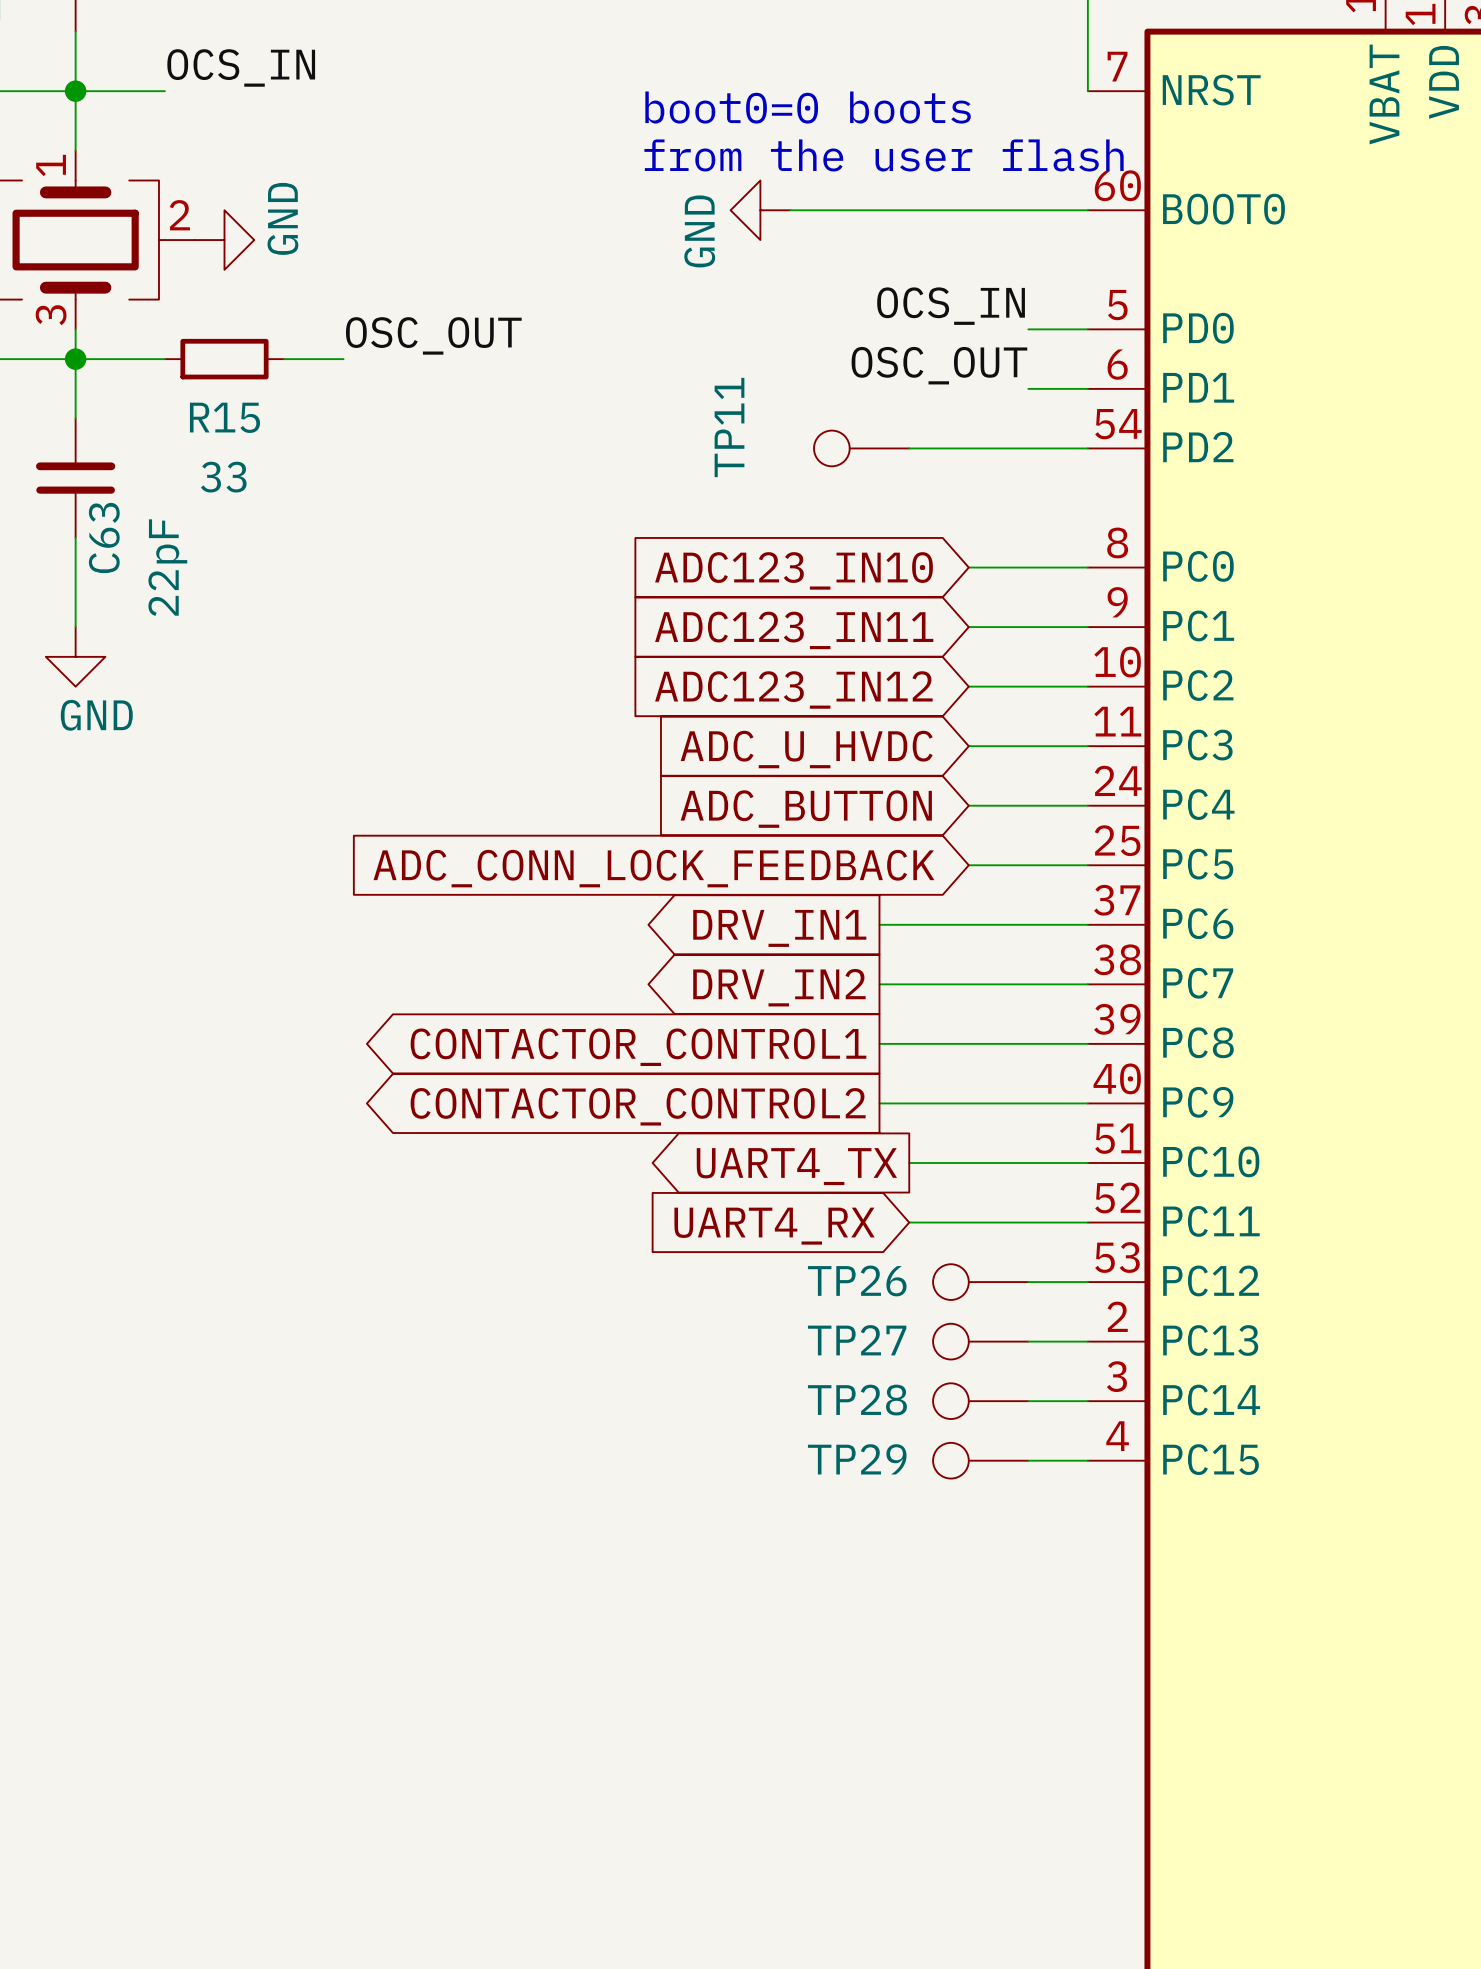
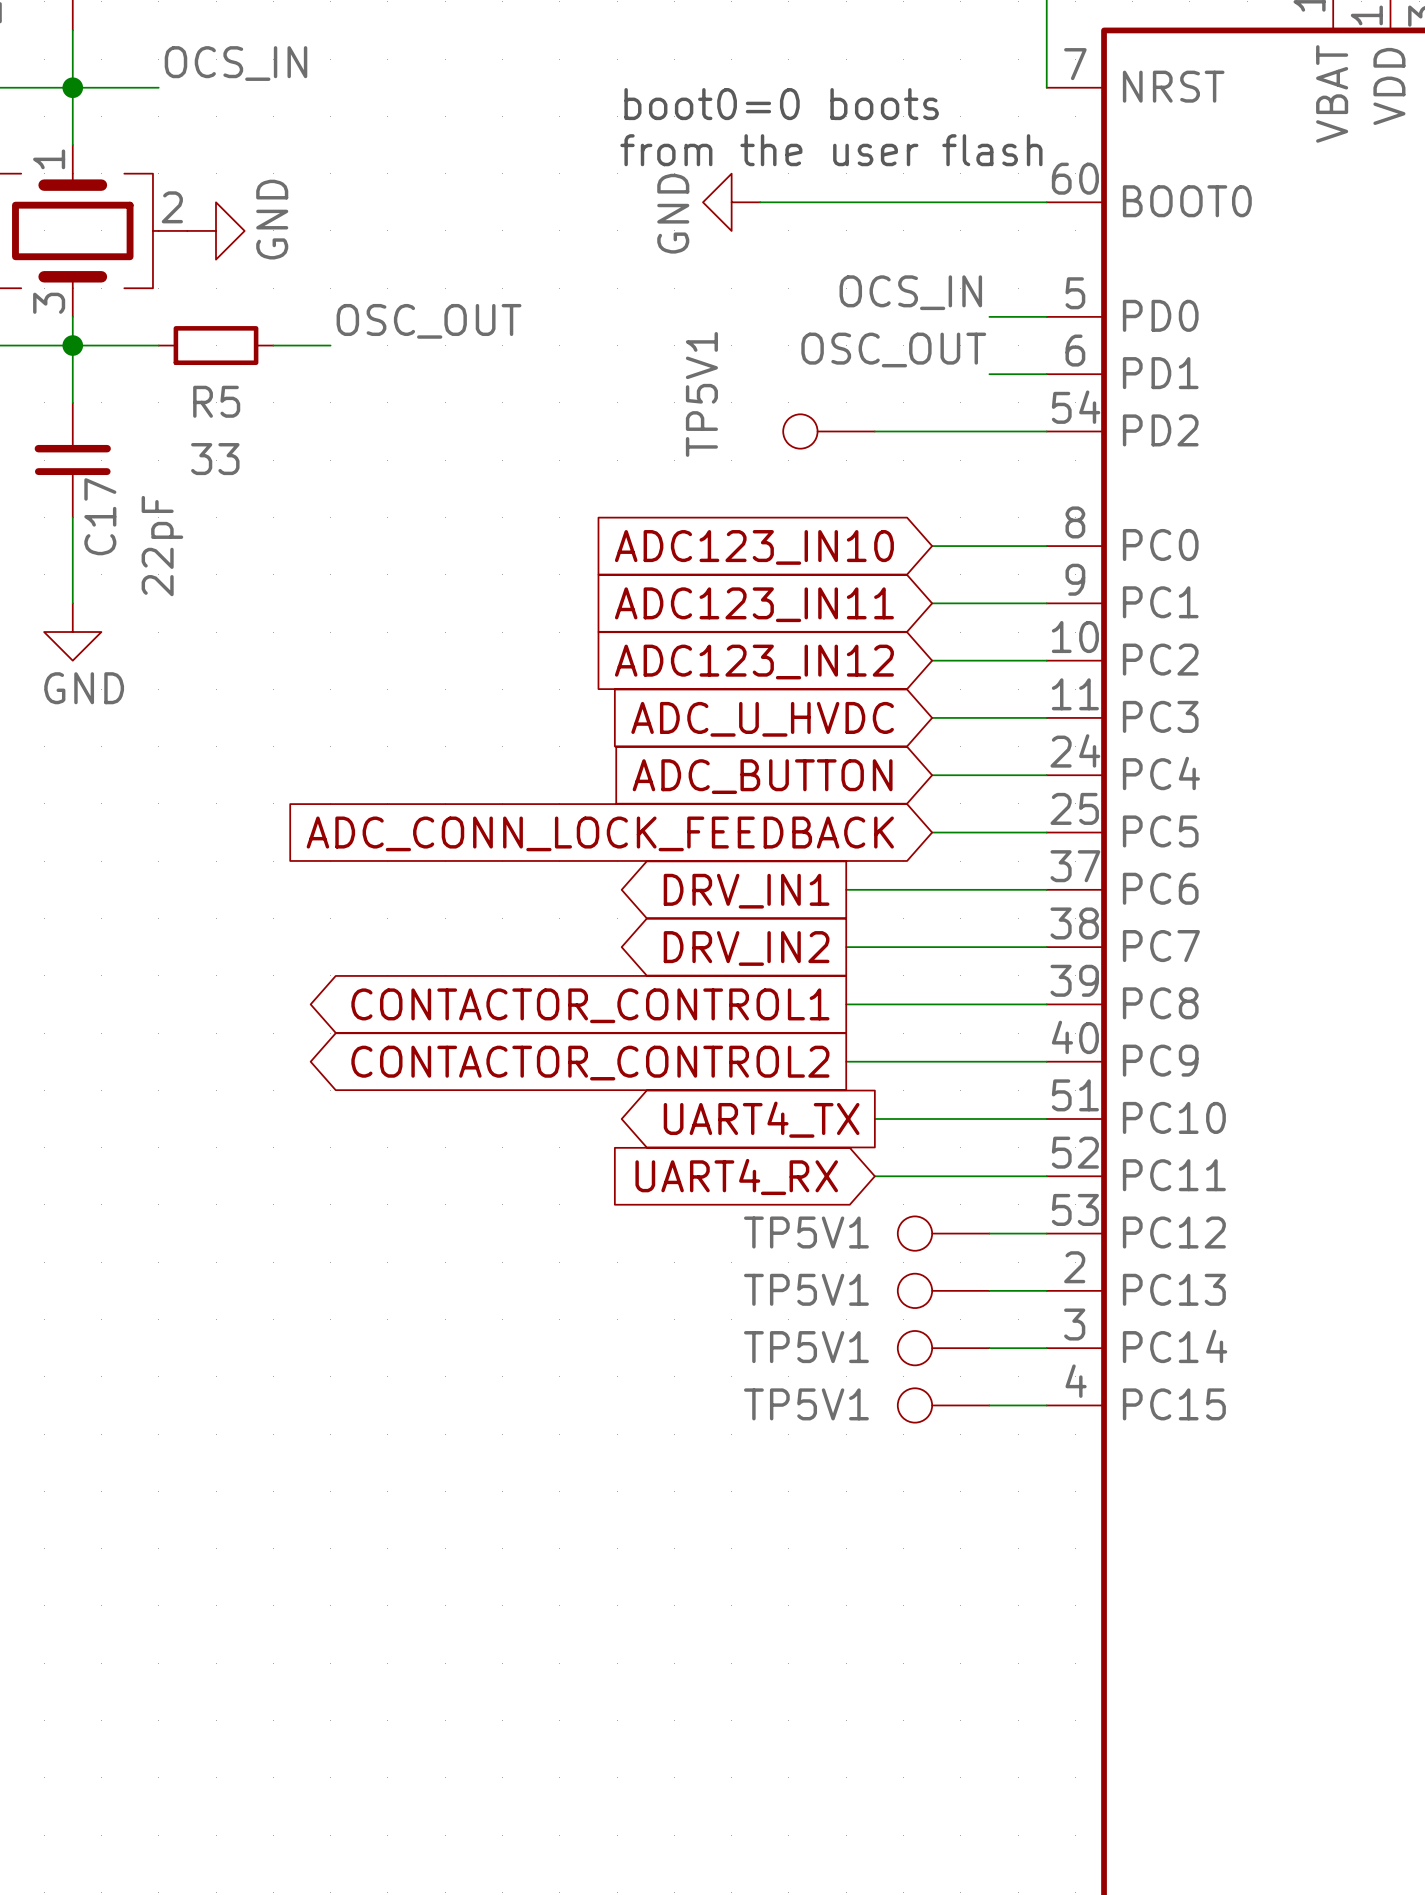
R15 name: R15 (224, 417) -> R5 (216, 401)
TP11 name: TP11 (729, 427) -> TP5V1 (701, 394)
C63 name: C63 (104, 538) -> C17 (100, 516)
TP26 name: TP26 (857, 1280) -> TP5V1 (806, 1232)
TP27 name: TP27 (857, 1340) -> TP5V1 (806, 1289)
TP28 name: TP28 (857, 1400) -> TP5V1 (806, 1347)
TP29 name: TP29 (857, 1459) -> TP5V1 (806, 1404)

